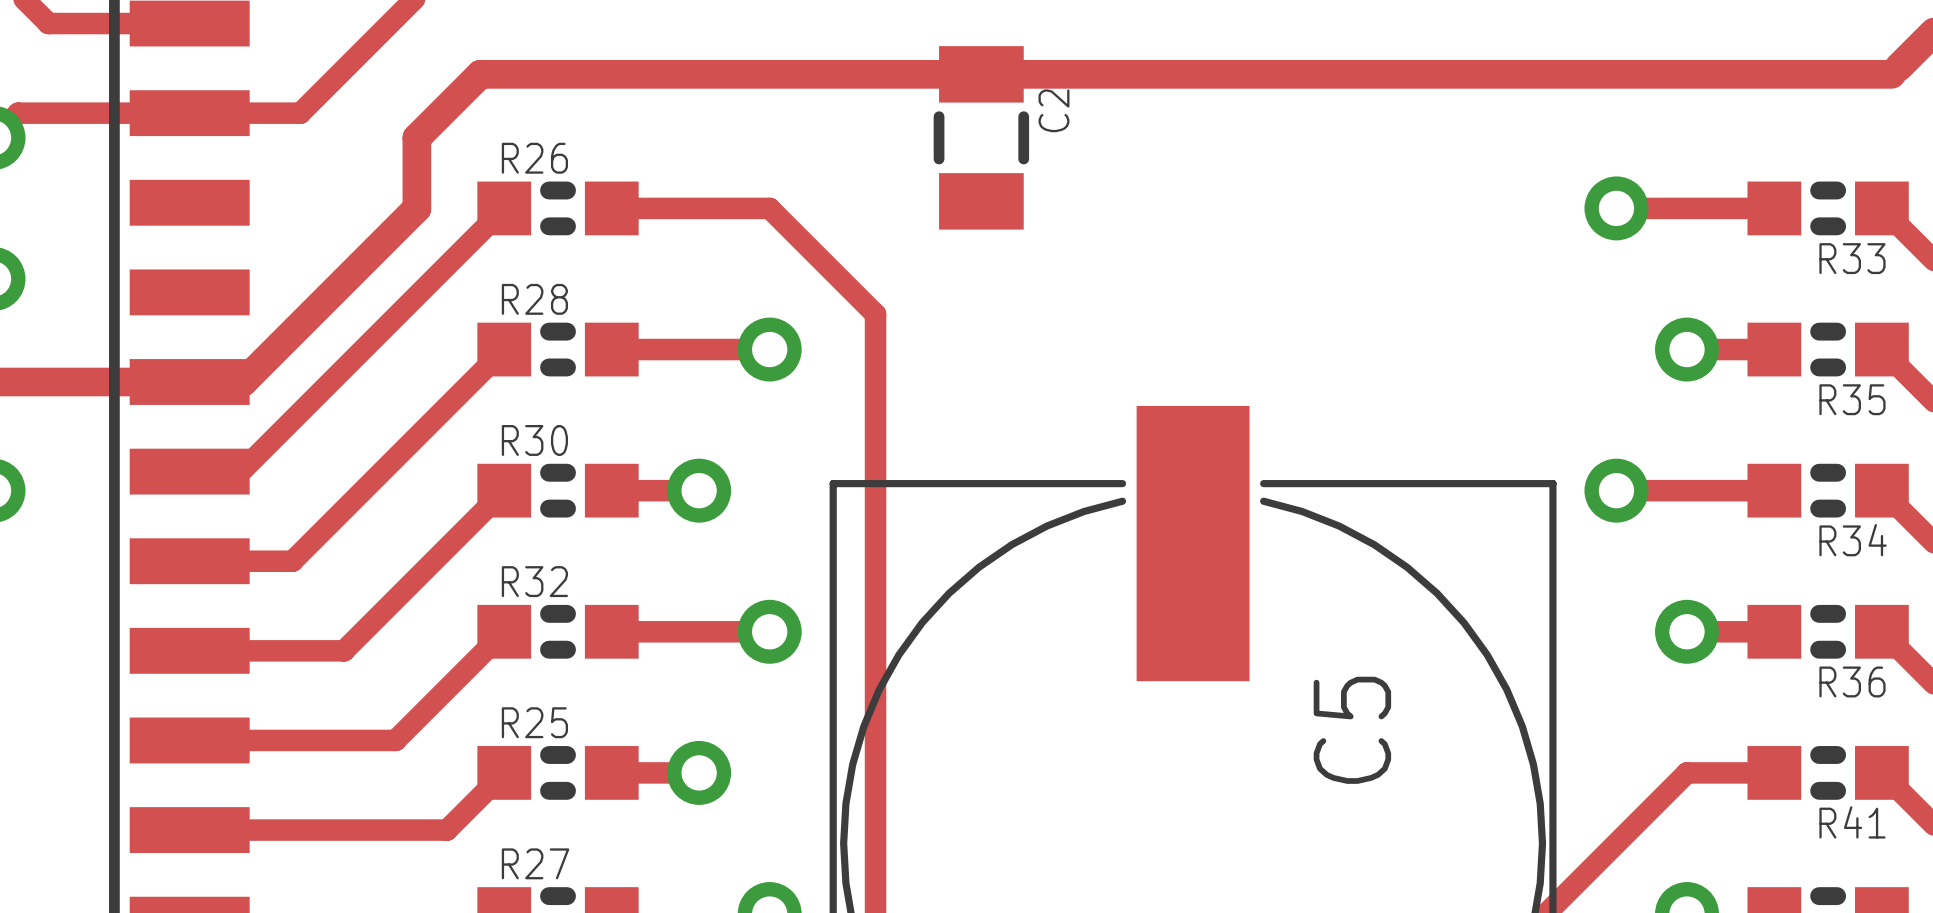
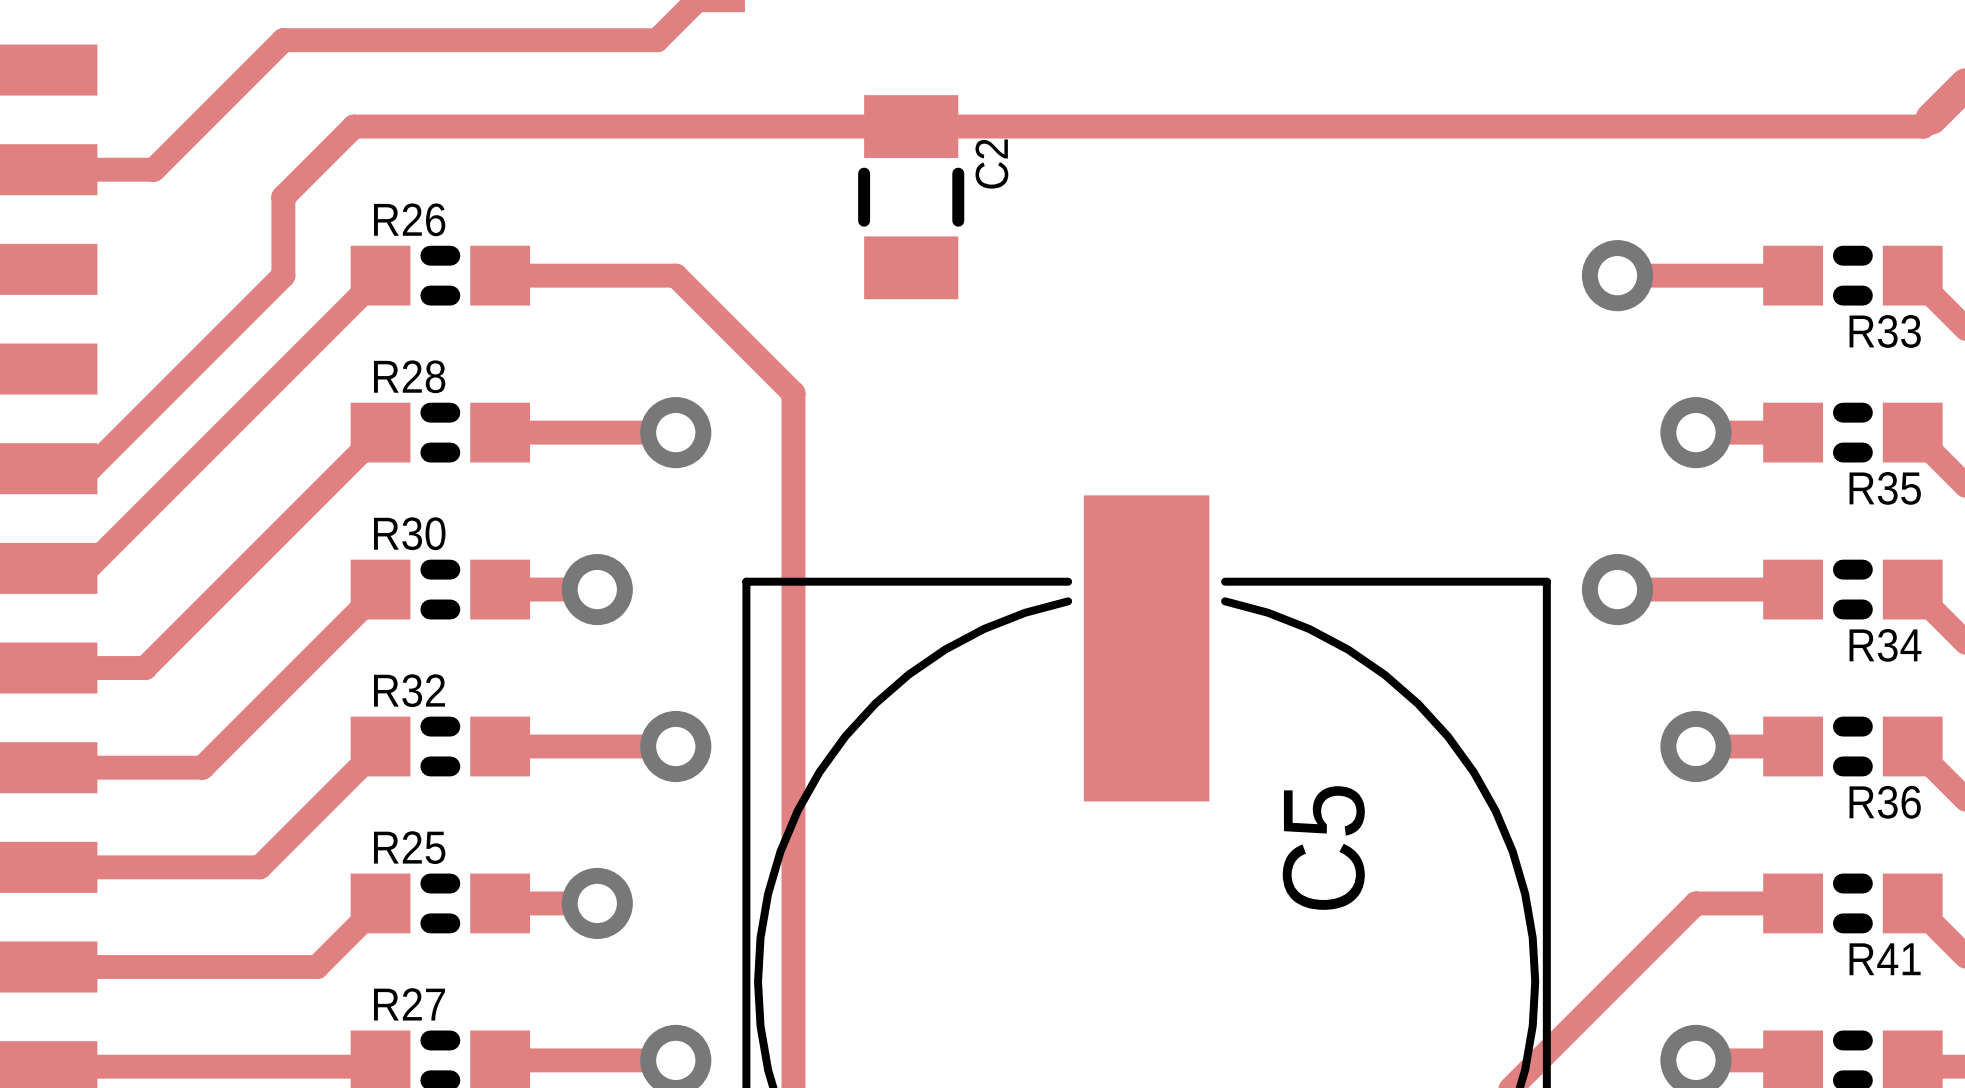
track width: thick (1891, 74) (480, 74) (416, 137) (416, 208) (243, 382) (189, 382) -> thin (1923, 126) (354, 126) (283, 197) (283, 275) (90, 468) (30, 468)

